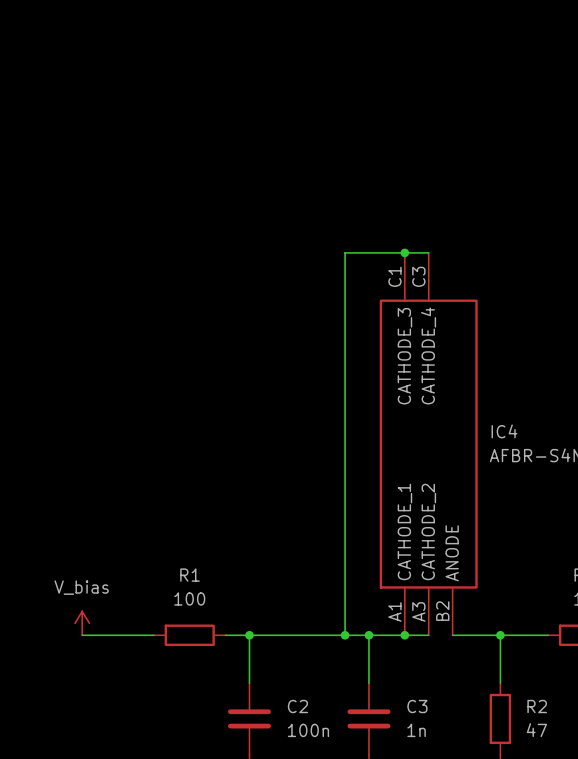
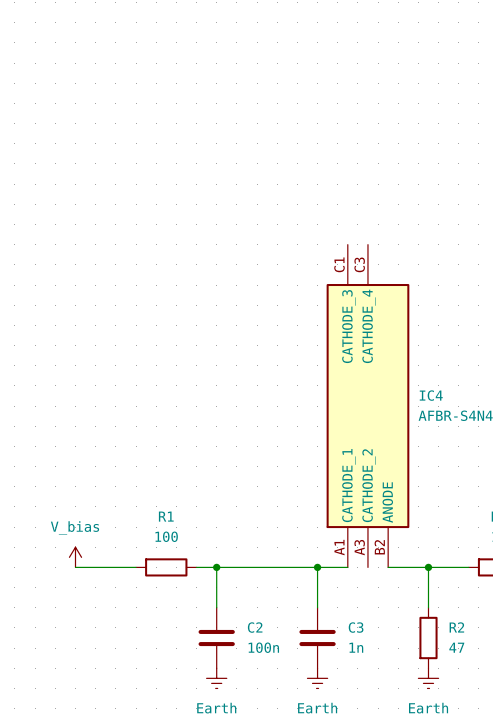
junction: (404, 252) -> none
wire: (428, 252) (345, 252) (345, 635) -> none
junction: (345, 635) -> none
wire: (404, 635) (428, 635) -> none
junction: (404, 635) -> none

